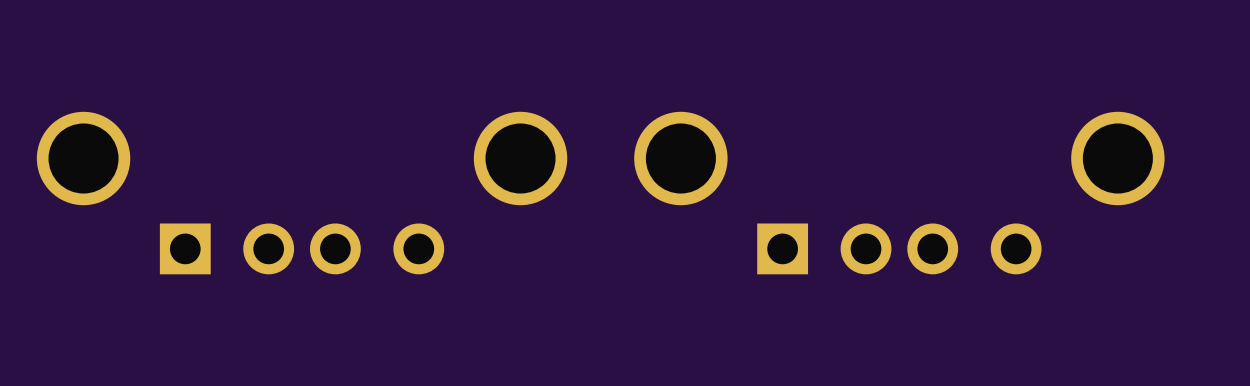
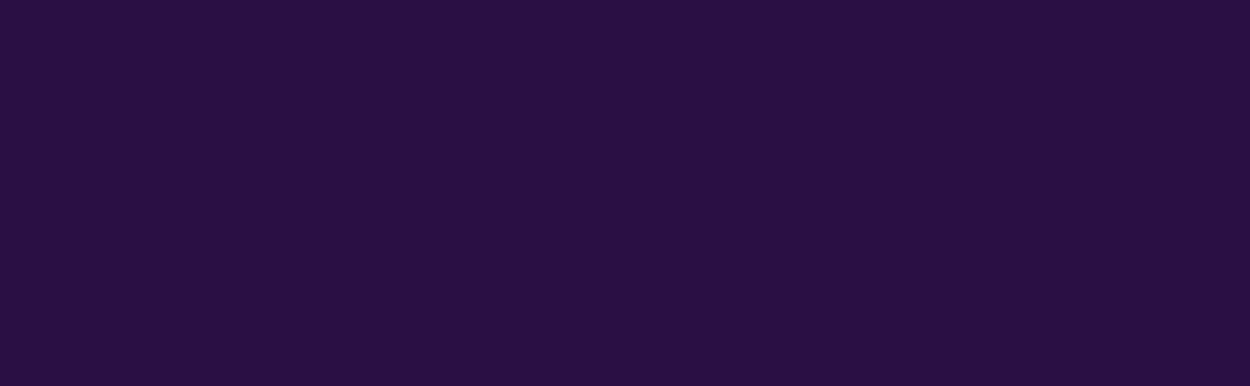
part: (302, 193) -> none
part: (899, 193) -> none

